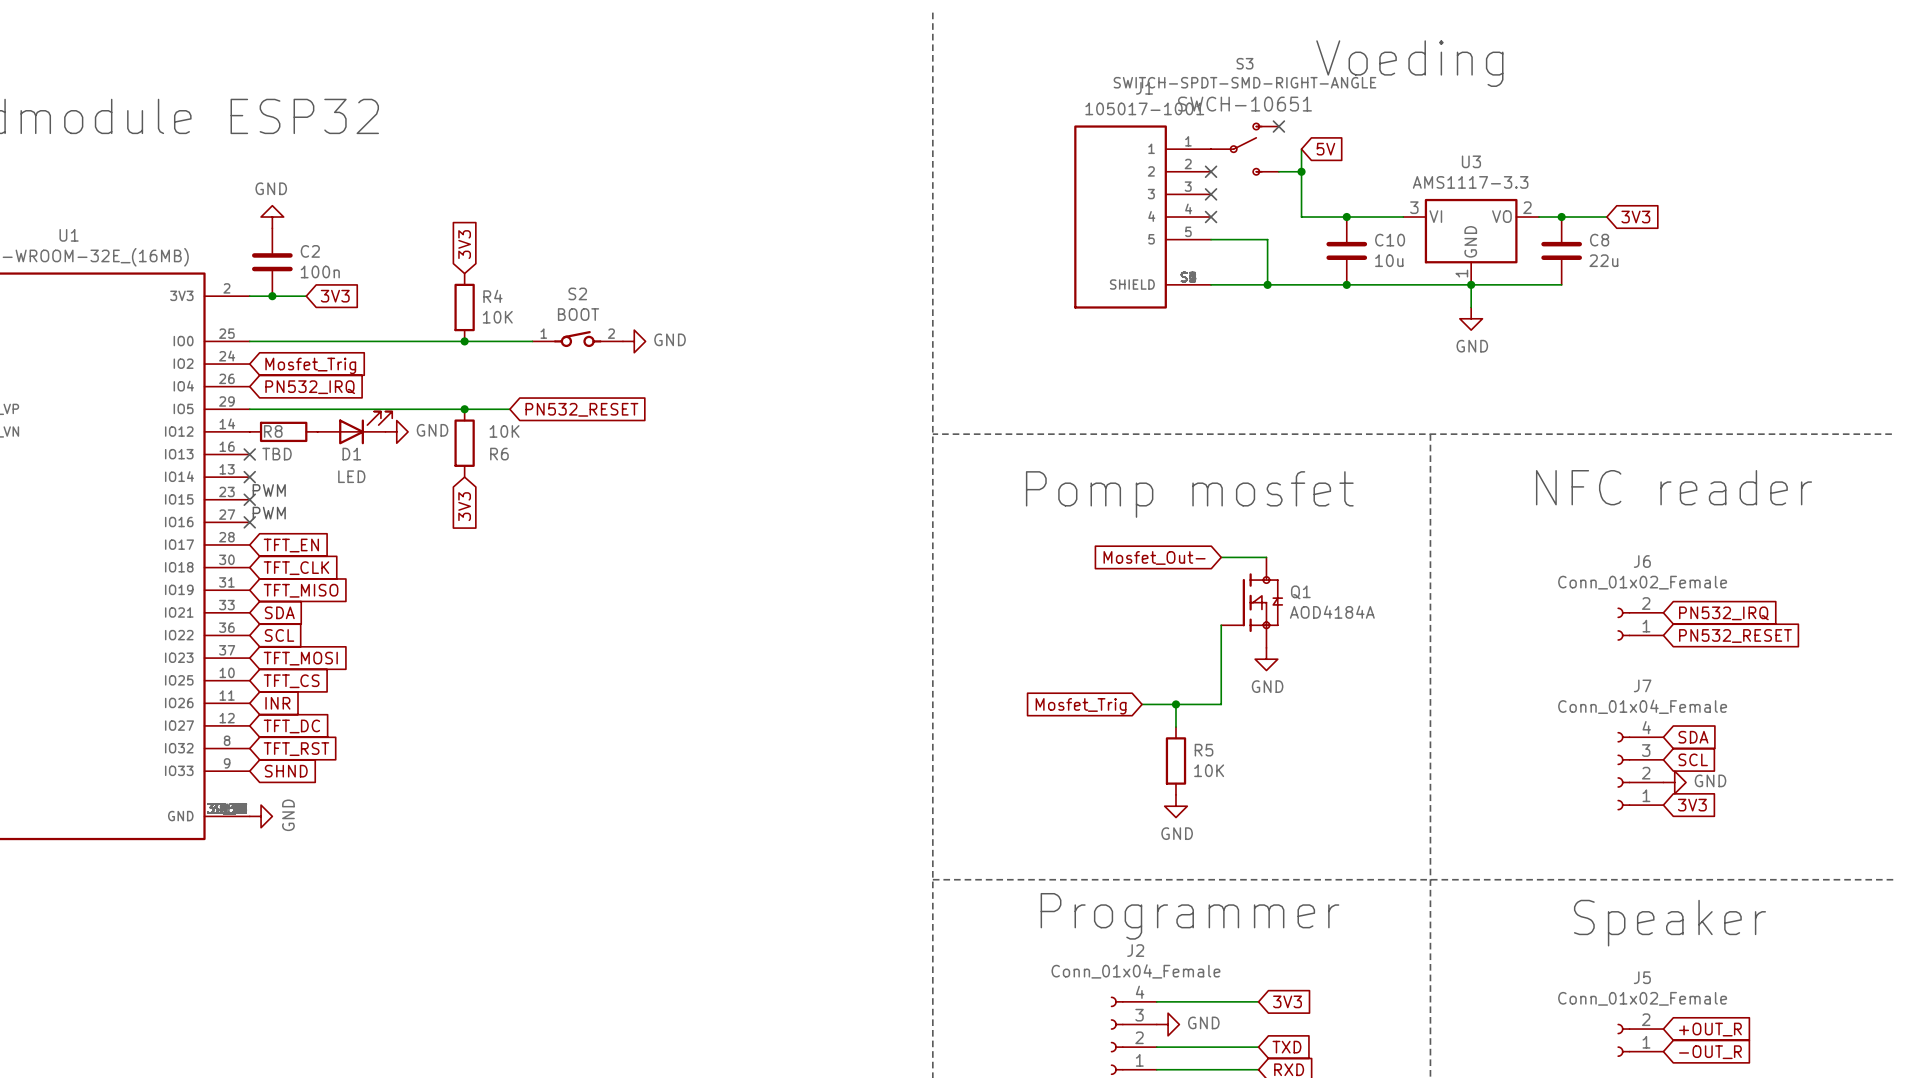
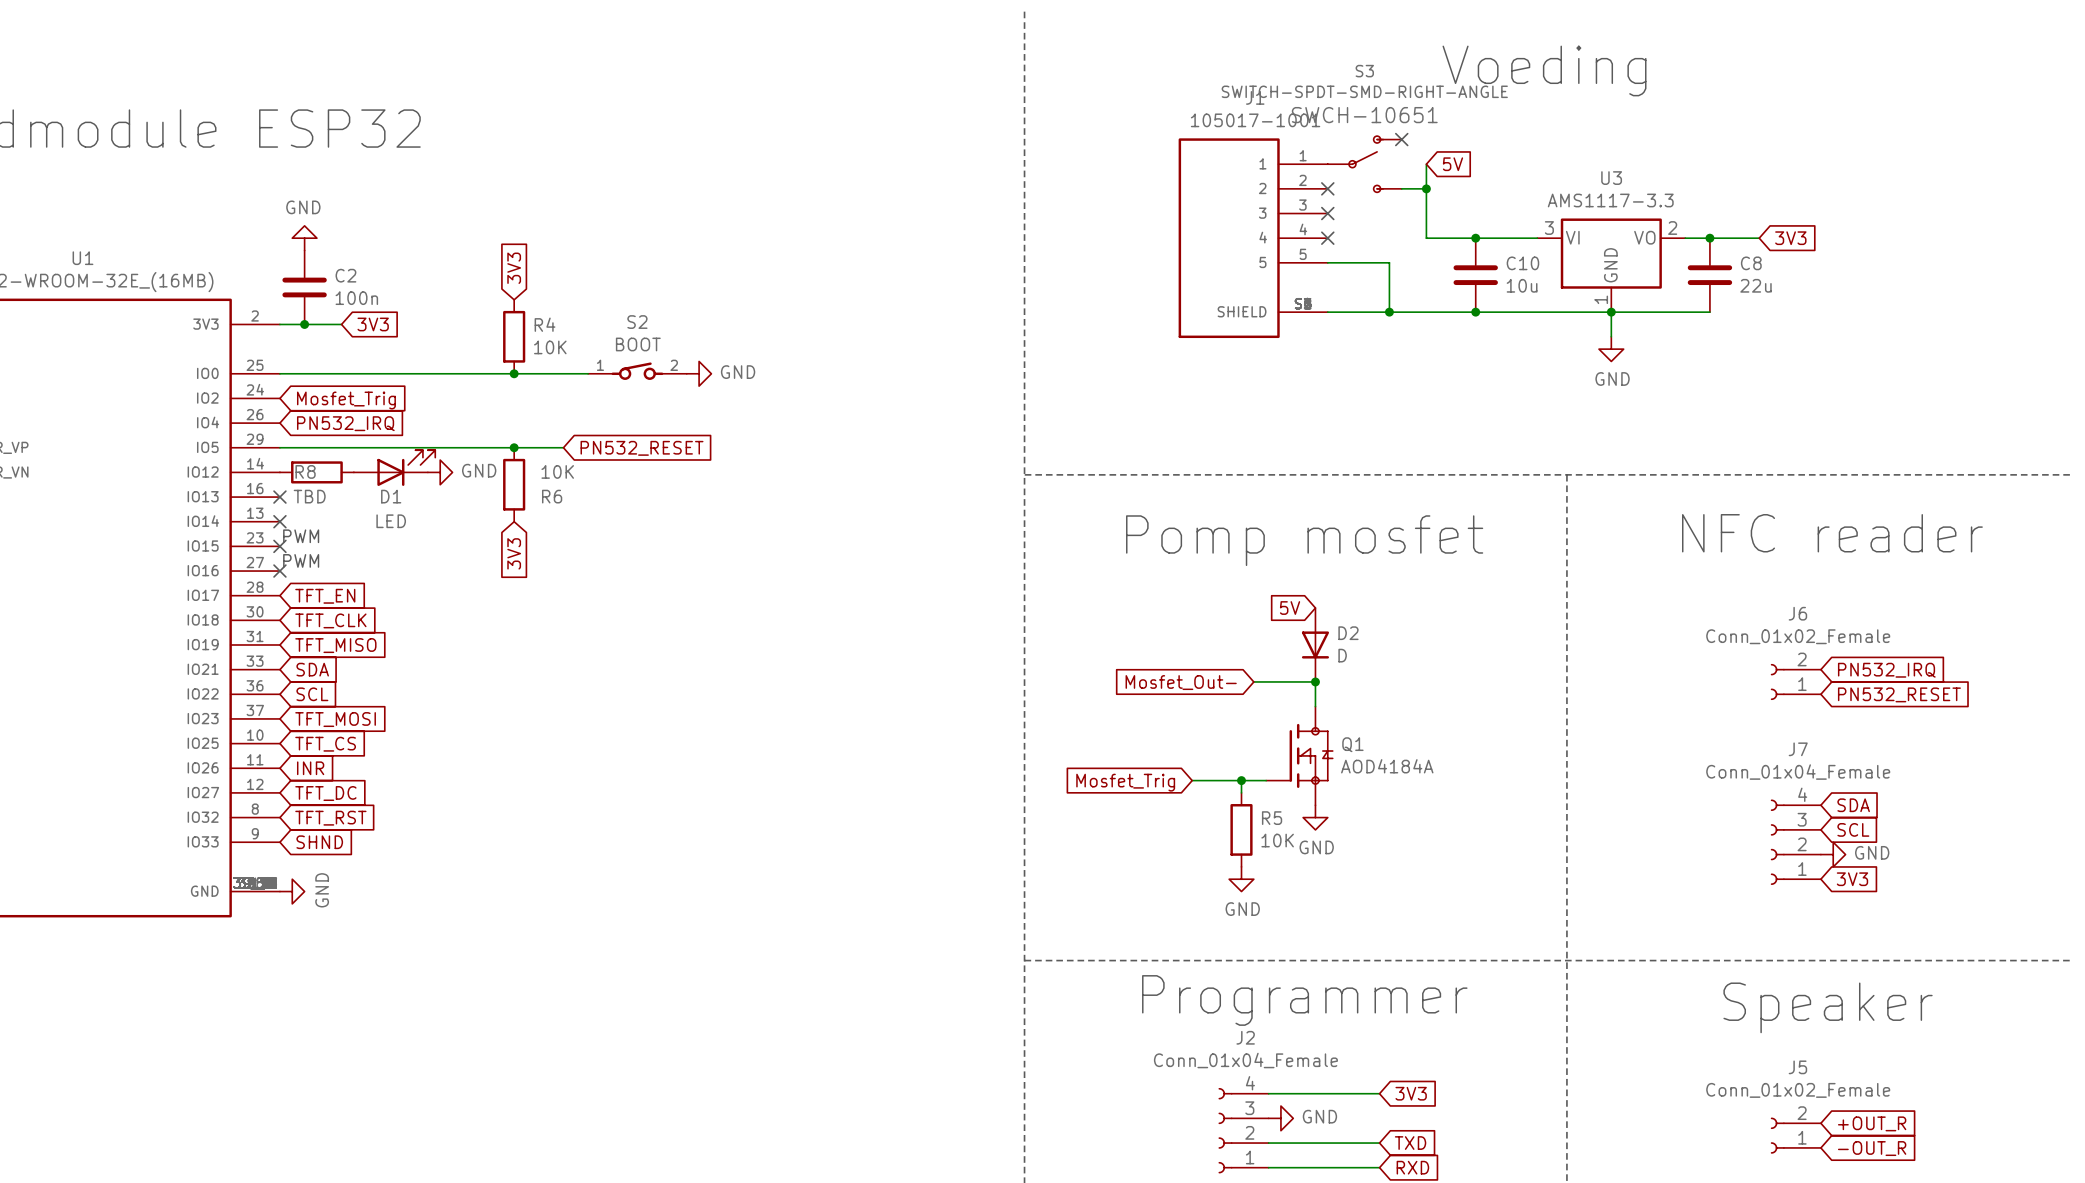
global label: none -> 5V (1290, 608)
global label position: Mosfet_Out- (1154, 557) -> Mosfet_Out- (1181, 682)
wire: (1221, 557) (1266, 557) -> none
D2: none -> D (1315, 644)
Q1 position: (1252, 602) -> (1299, 755)
wire: none -> (1253, 681) (1315, 681) (1315, 706)
junction: none -> (1315, 681)
wire: (1221, 625) (1221, 704) (1142, 704) -> none
power symbol: GND (1266, 659) -> none
wire: (1175, 704) (1175, 727) -> none
junction: (1175, 704) -> none
global label position: Mosfet_Trig (1081, 706) -> Mosfet_Trig (1125, 782)
wire: none -> (1192, 780) (1266, 780)
wire: none -> (1241, 780) (1241, 792)
junction: none -> (1241, 780)
power symbol: none -> GND (1315, 817)
R5 position: (1175, 760) -> (1241, 829)
power symbol: none -> GND (1241, 879)
power symbol: GND (1175, 806) -> none

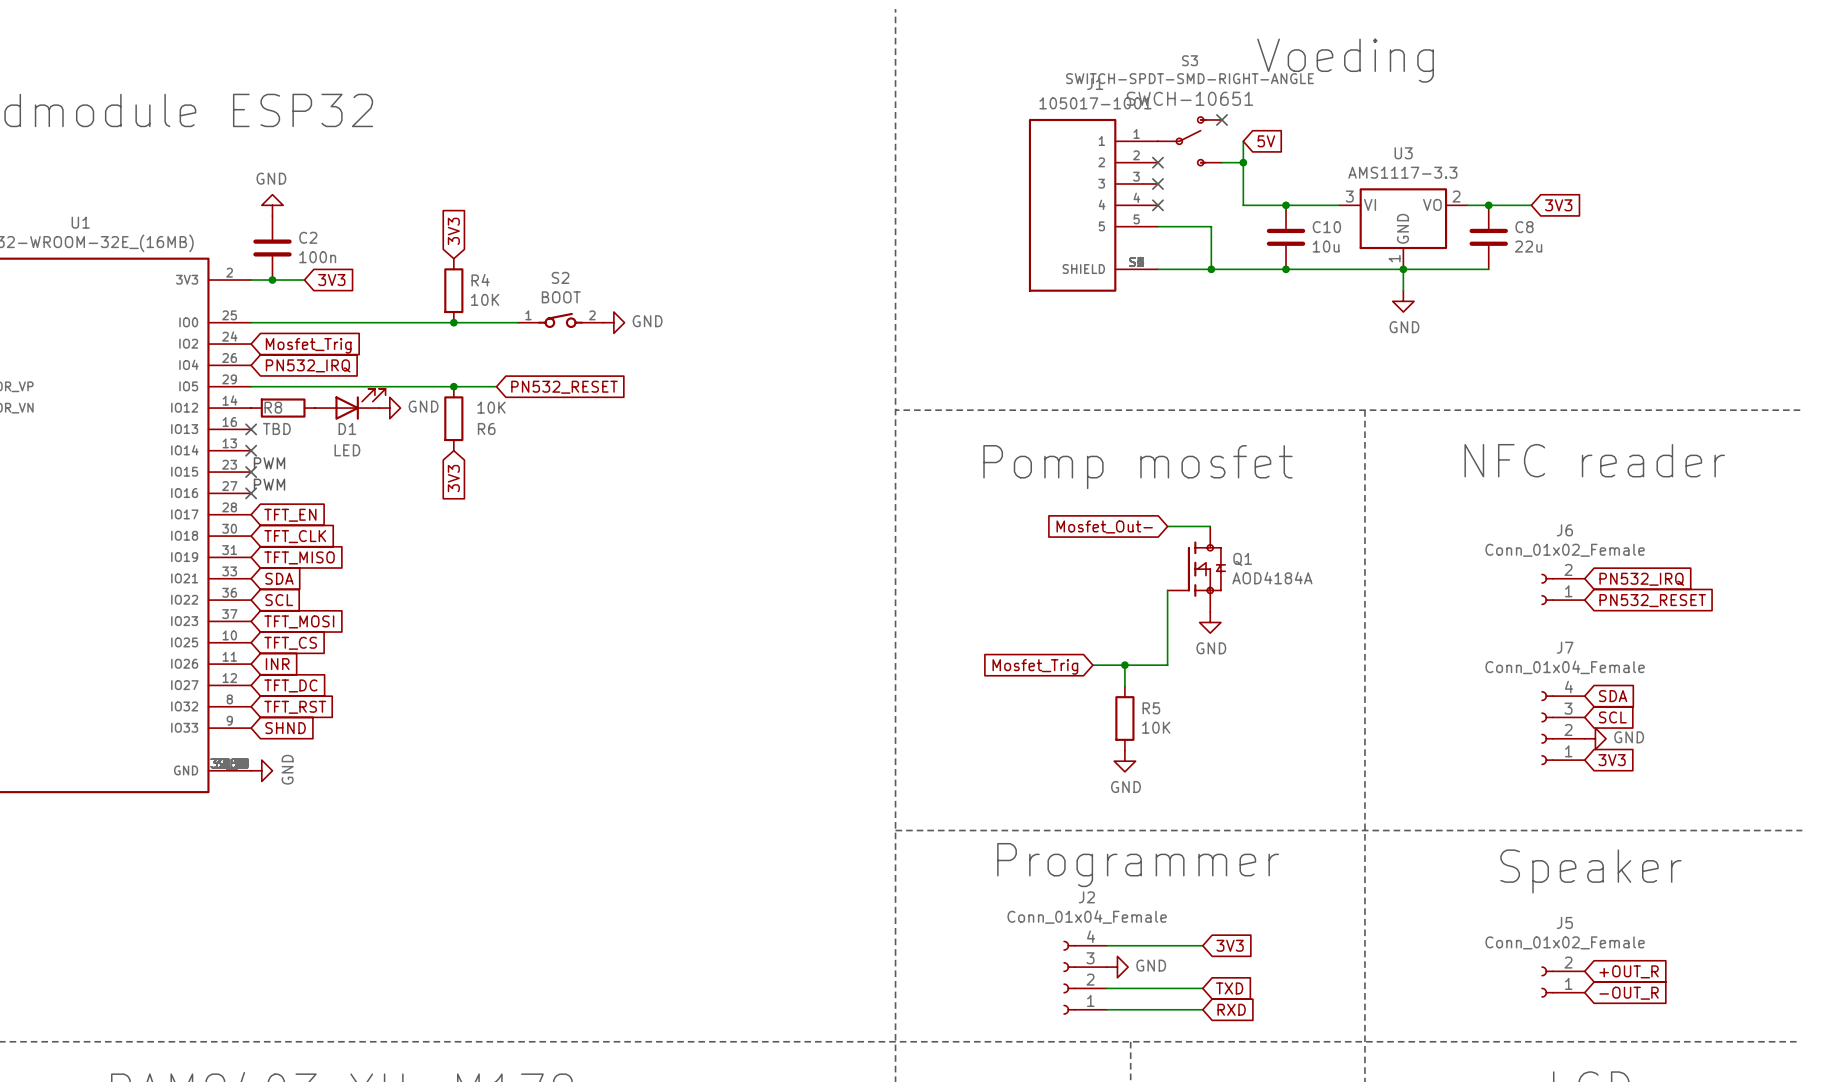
global label: 5V (1290, 608) -> none
wire: none -> (1167, 526) (1210, 526)
D2: D (1315, 644) -> none
wire: (1253, 681) (1315, 681) (1315, 706) -> none
junction: (1315, 681) -> none
global label position: Mosfet_Out- (1181, 682) -> Mosfet_Out- (1104, 526)
wire: none -> (1167, 590) (1167, 665) (1092, 665)
power symbol: none -> GND (1210, 622)
Q1 position: (1299, 755) -> (1196, 569)
wire: none -> (1124, 665) (1124, 686)
junction: none -> (1124, 665)
wire: (1192, 780) (1266, 780) -> none
wire: (1241, 780) (1241, 792) -> none
junction: (1241, 780) -> none
global label position: Mosfet_Trig (1125, 782) -> Mosfet_Trig (1035, 666)
power symbol: GND (1315, 817) -> none
R5 position: (1241, 829) -> (1124, 718)
power symbol: GND (1241, 879) -> none
power symbol: none -> GND (1124, 761)

